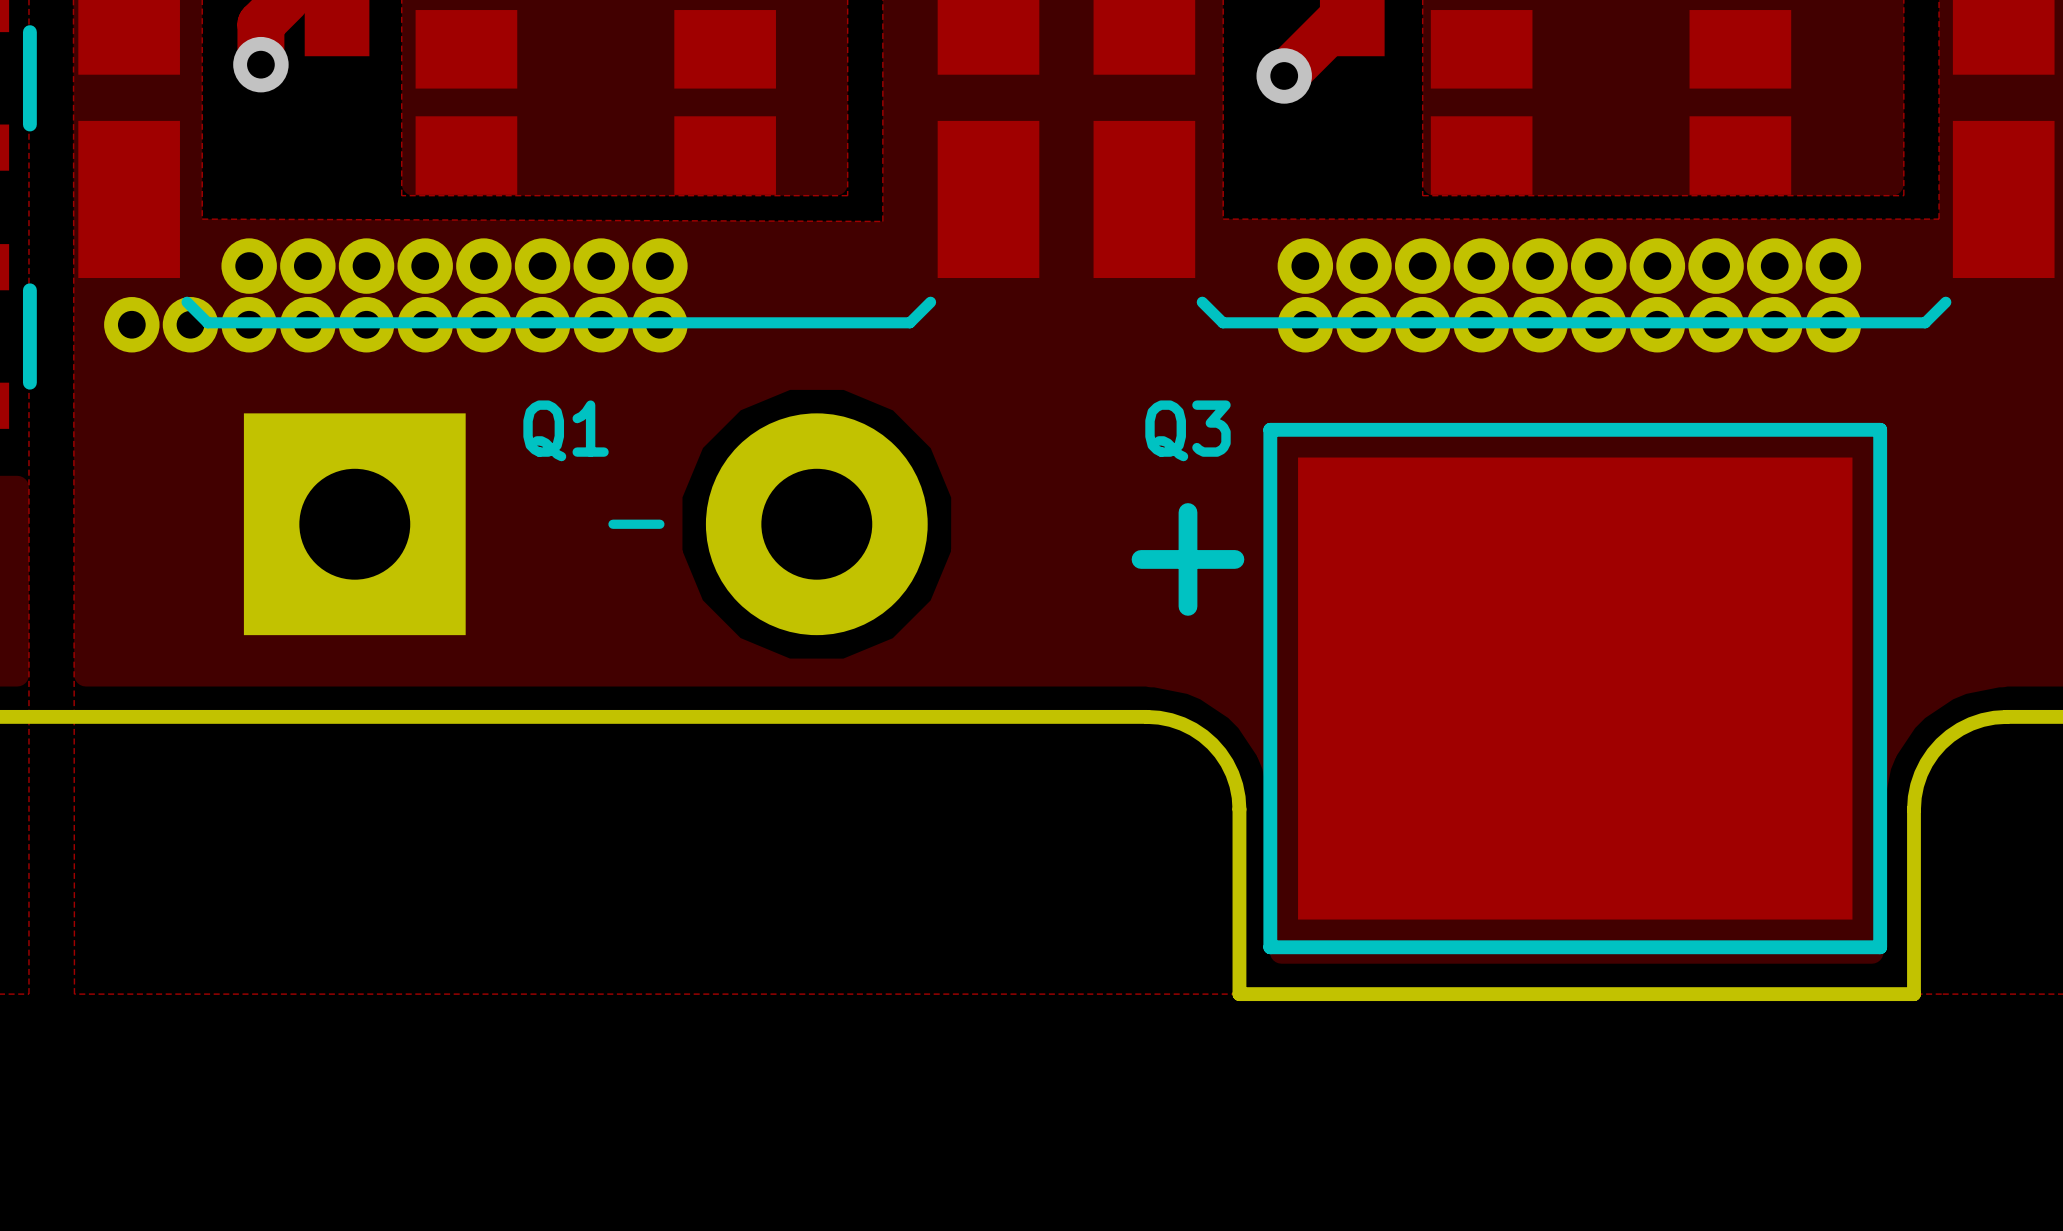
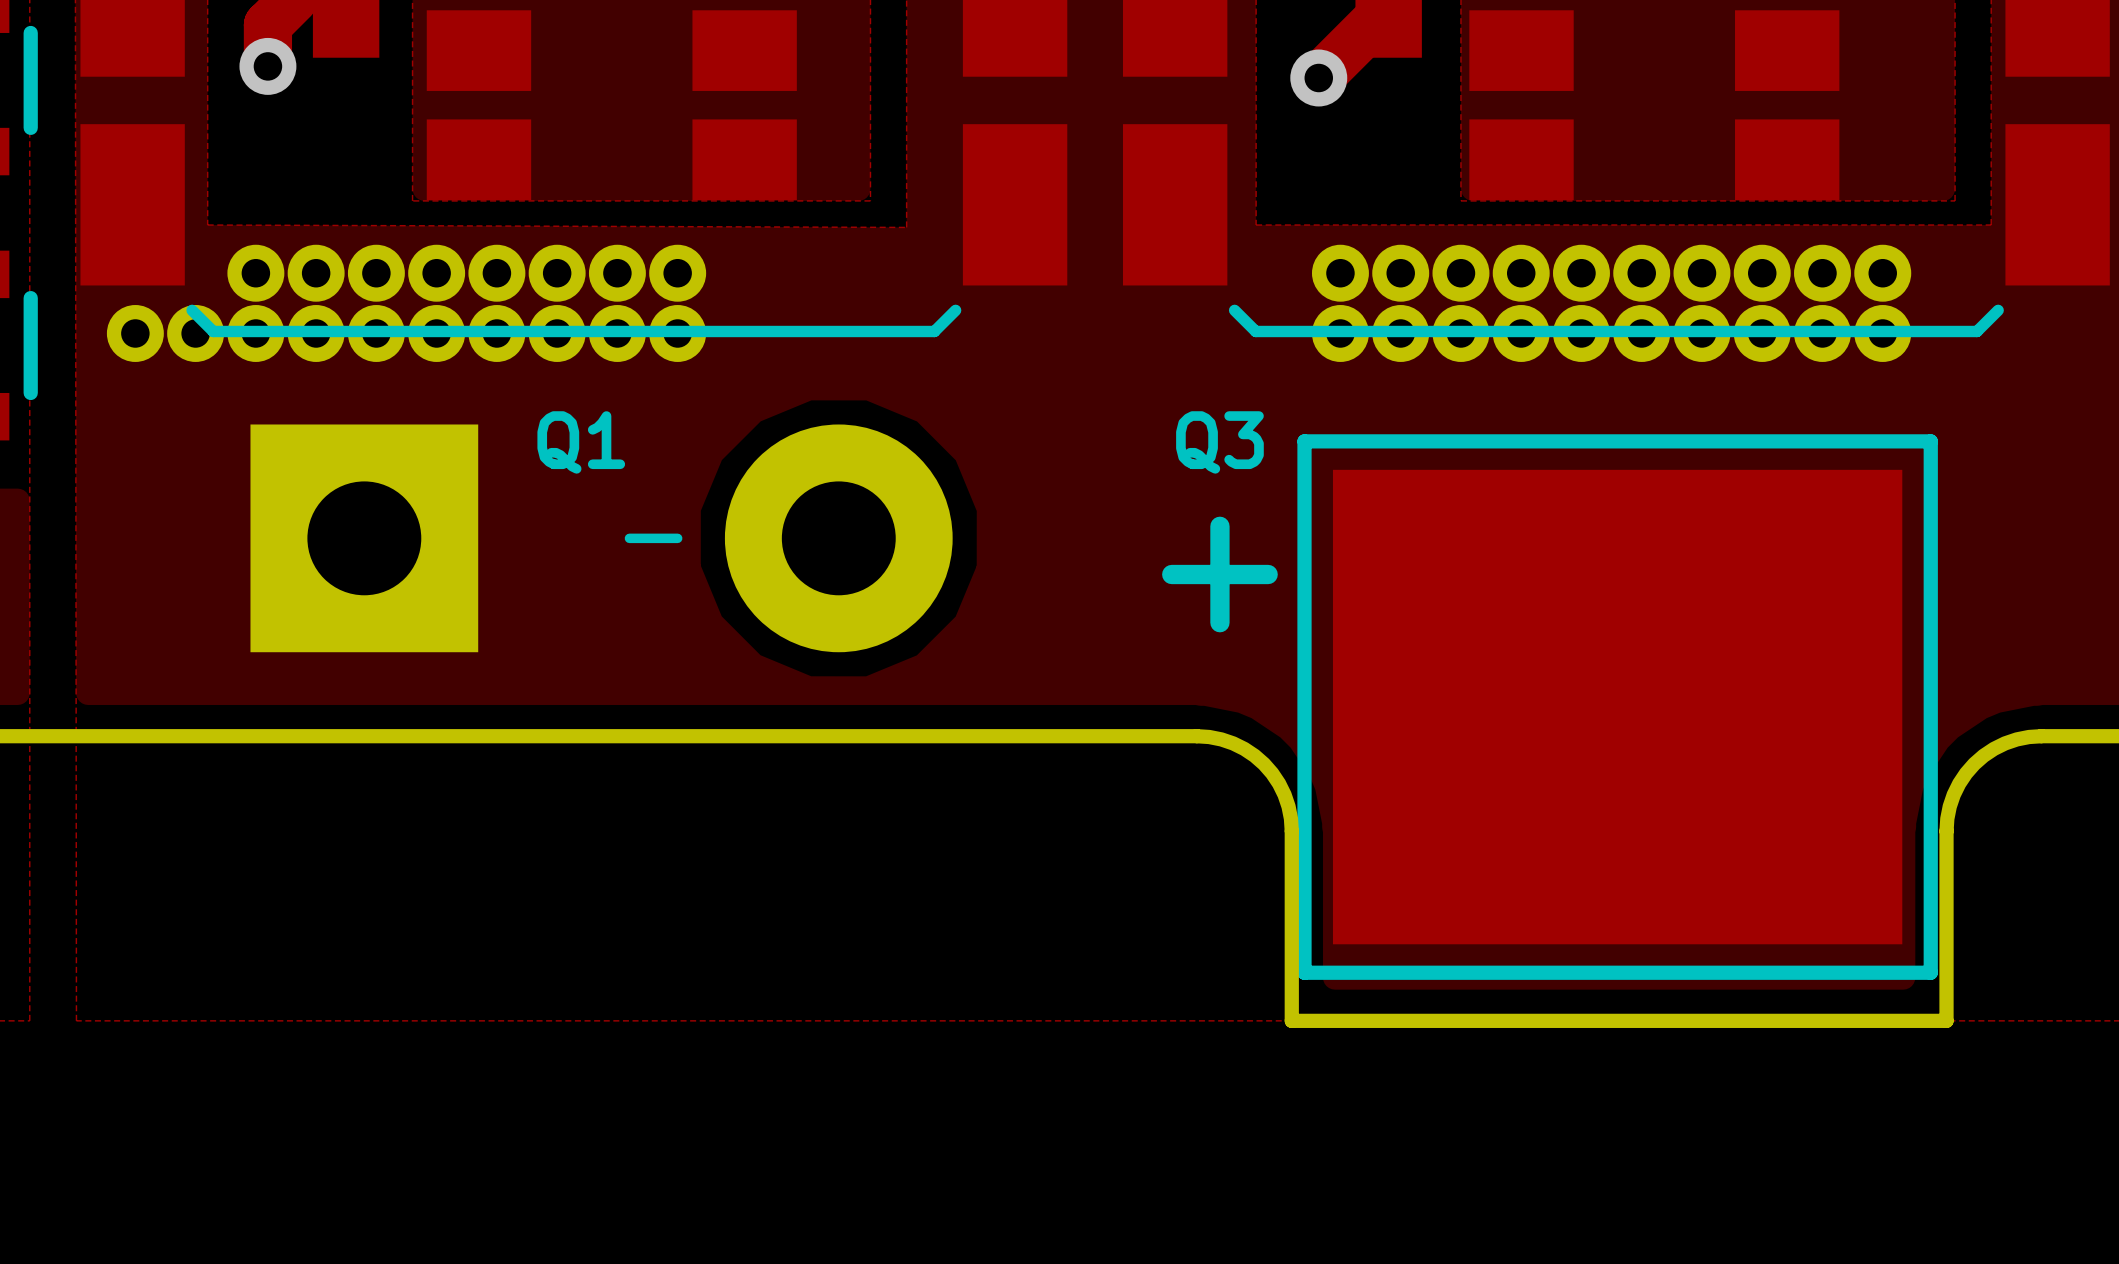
board edge: (1147, 716) (1159, 717) (1182, 723) (1203, 736) (1220, 753) (1232, 773) (1238, 797) (1239, 809) (1239, 994) (1257, 994) -> (1177, 736) (1209, 737) (1233, 743) (1244, 748) (1263, 763) (1272, 773) (1284, 794) (1290, 818) (1291, 831) (1291, 1020)
board edge: (2006, 716) (1994, 717) (1971, 723) (1950, 736) (1933, 753) (1921, 773) (1914, 797) (1913, 809) (1913, 994) (1895, 994) -> (2060, 736) (2029, 737) (2005, 743) (1993, 748) (1974, 763) (1966, 773) (1953, 794) (1947, 818) (1946, 831) (1946, 1020)

